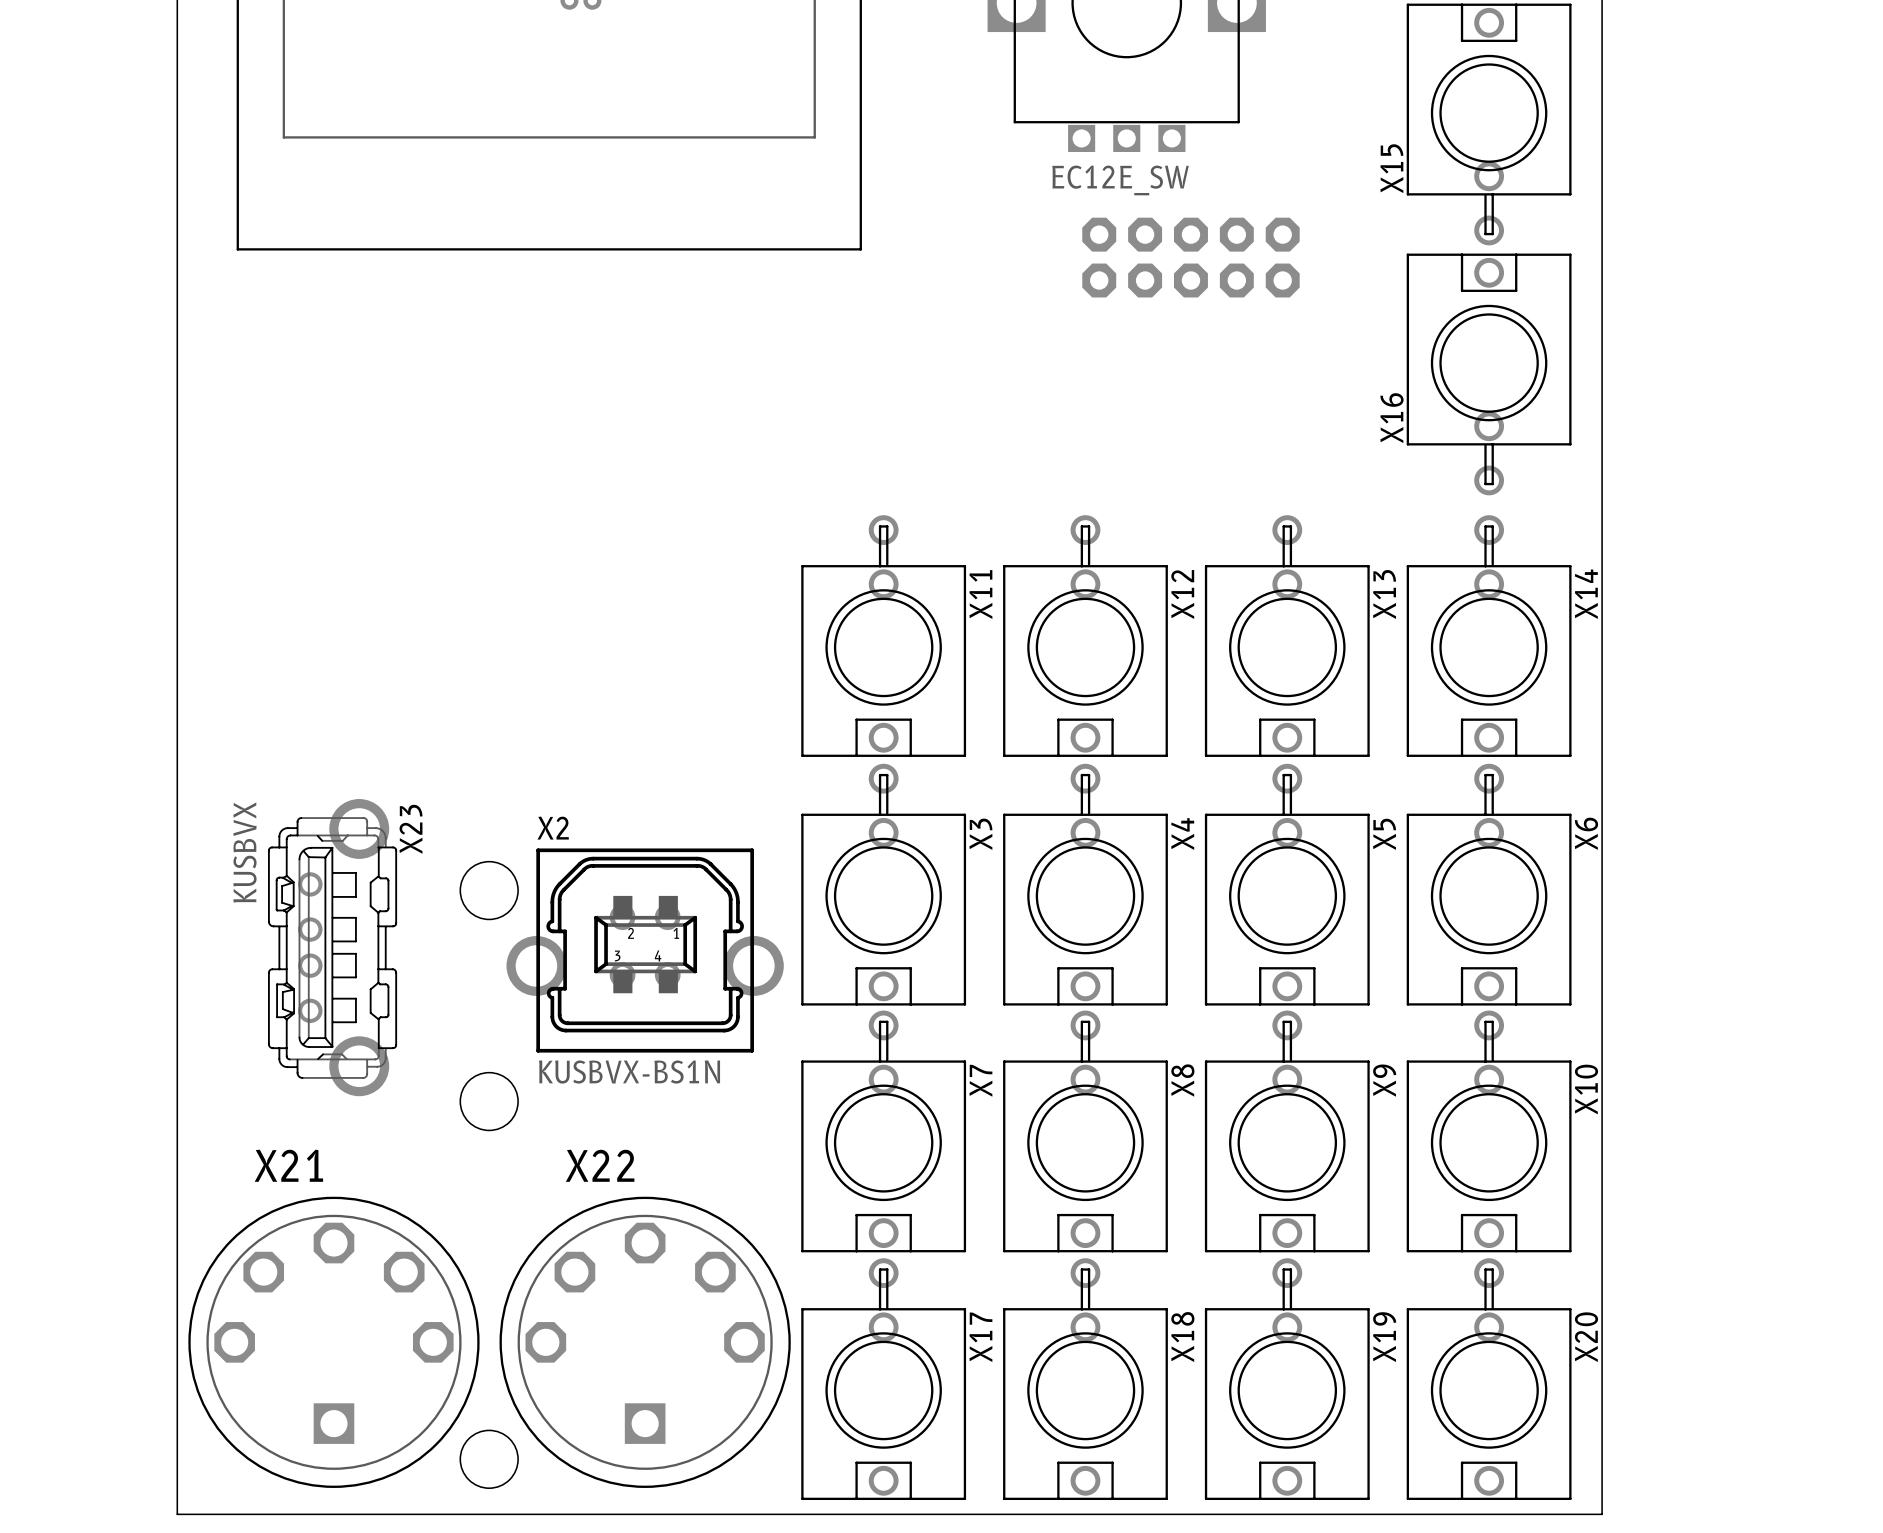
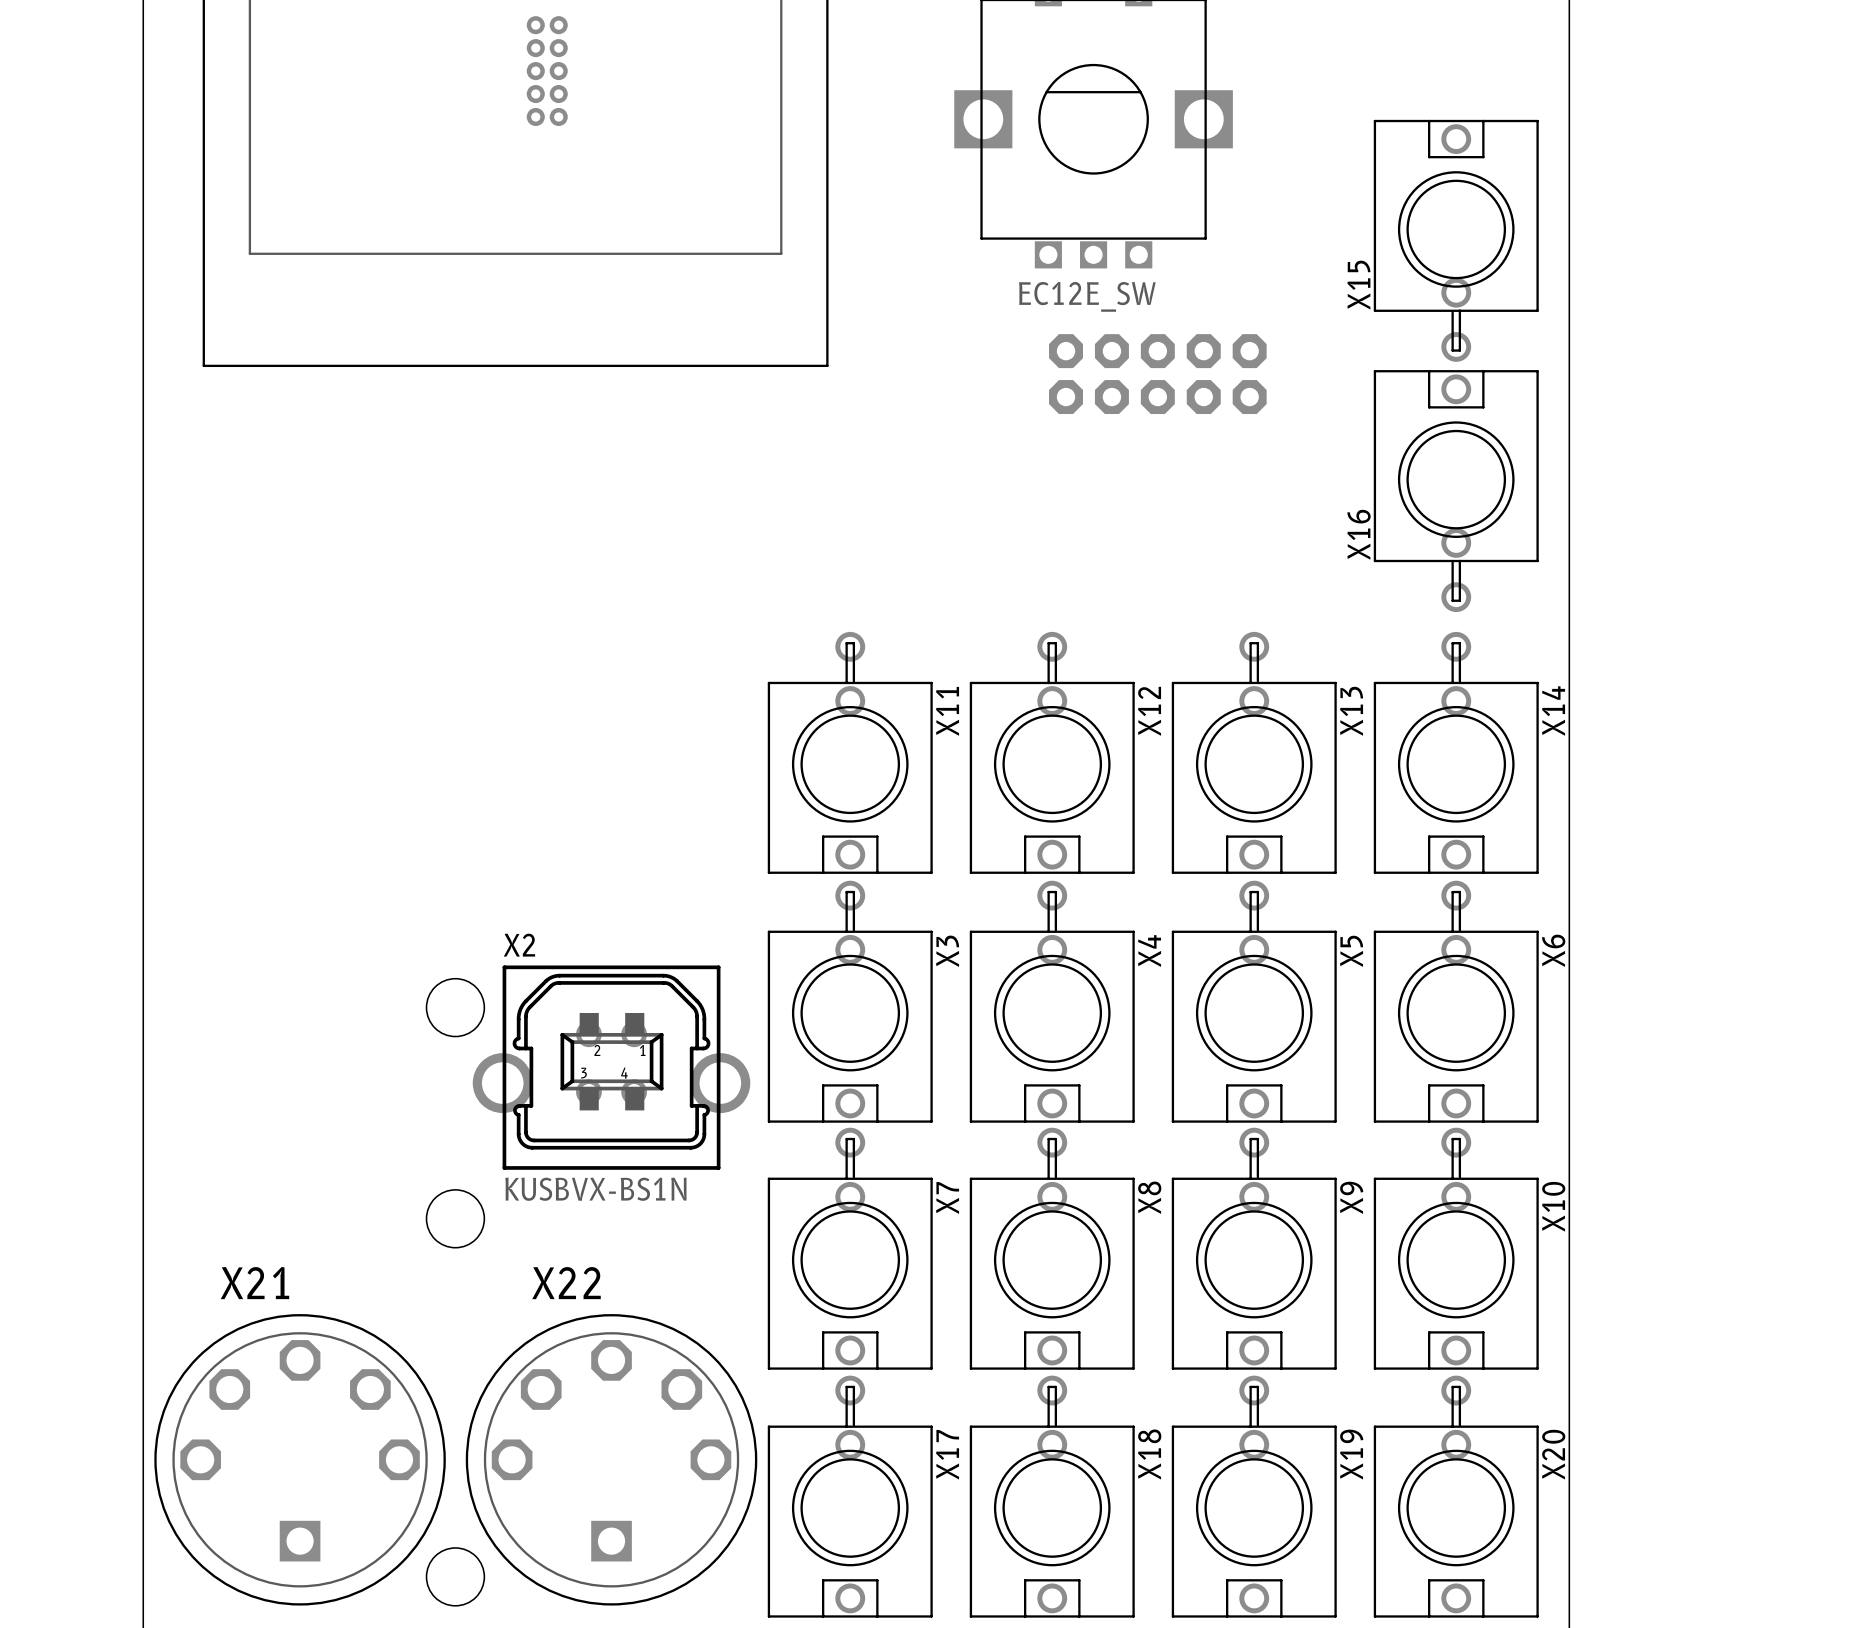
X23: KUSBVX (332, 947) -> none

